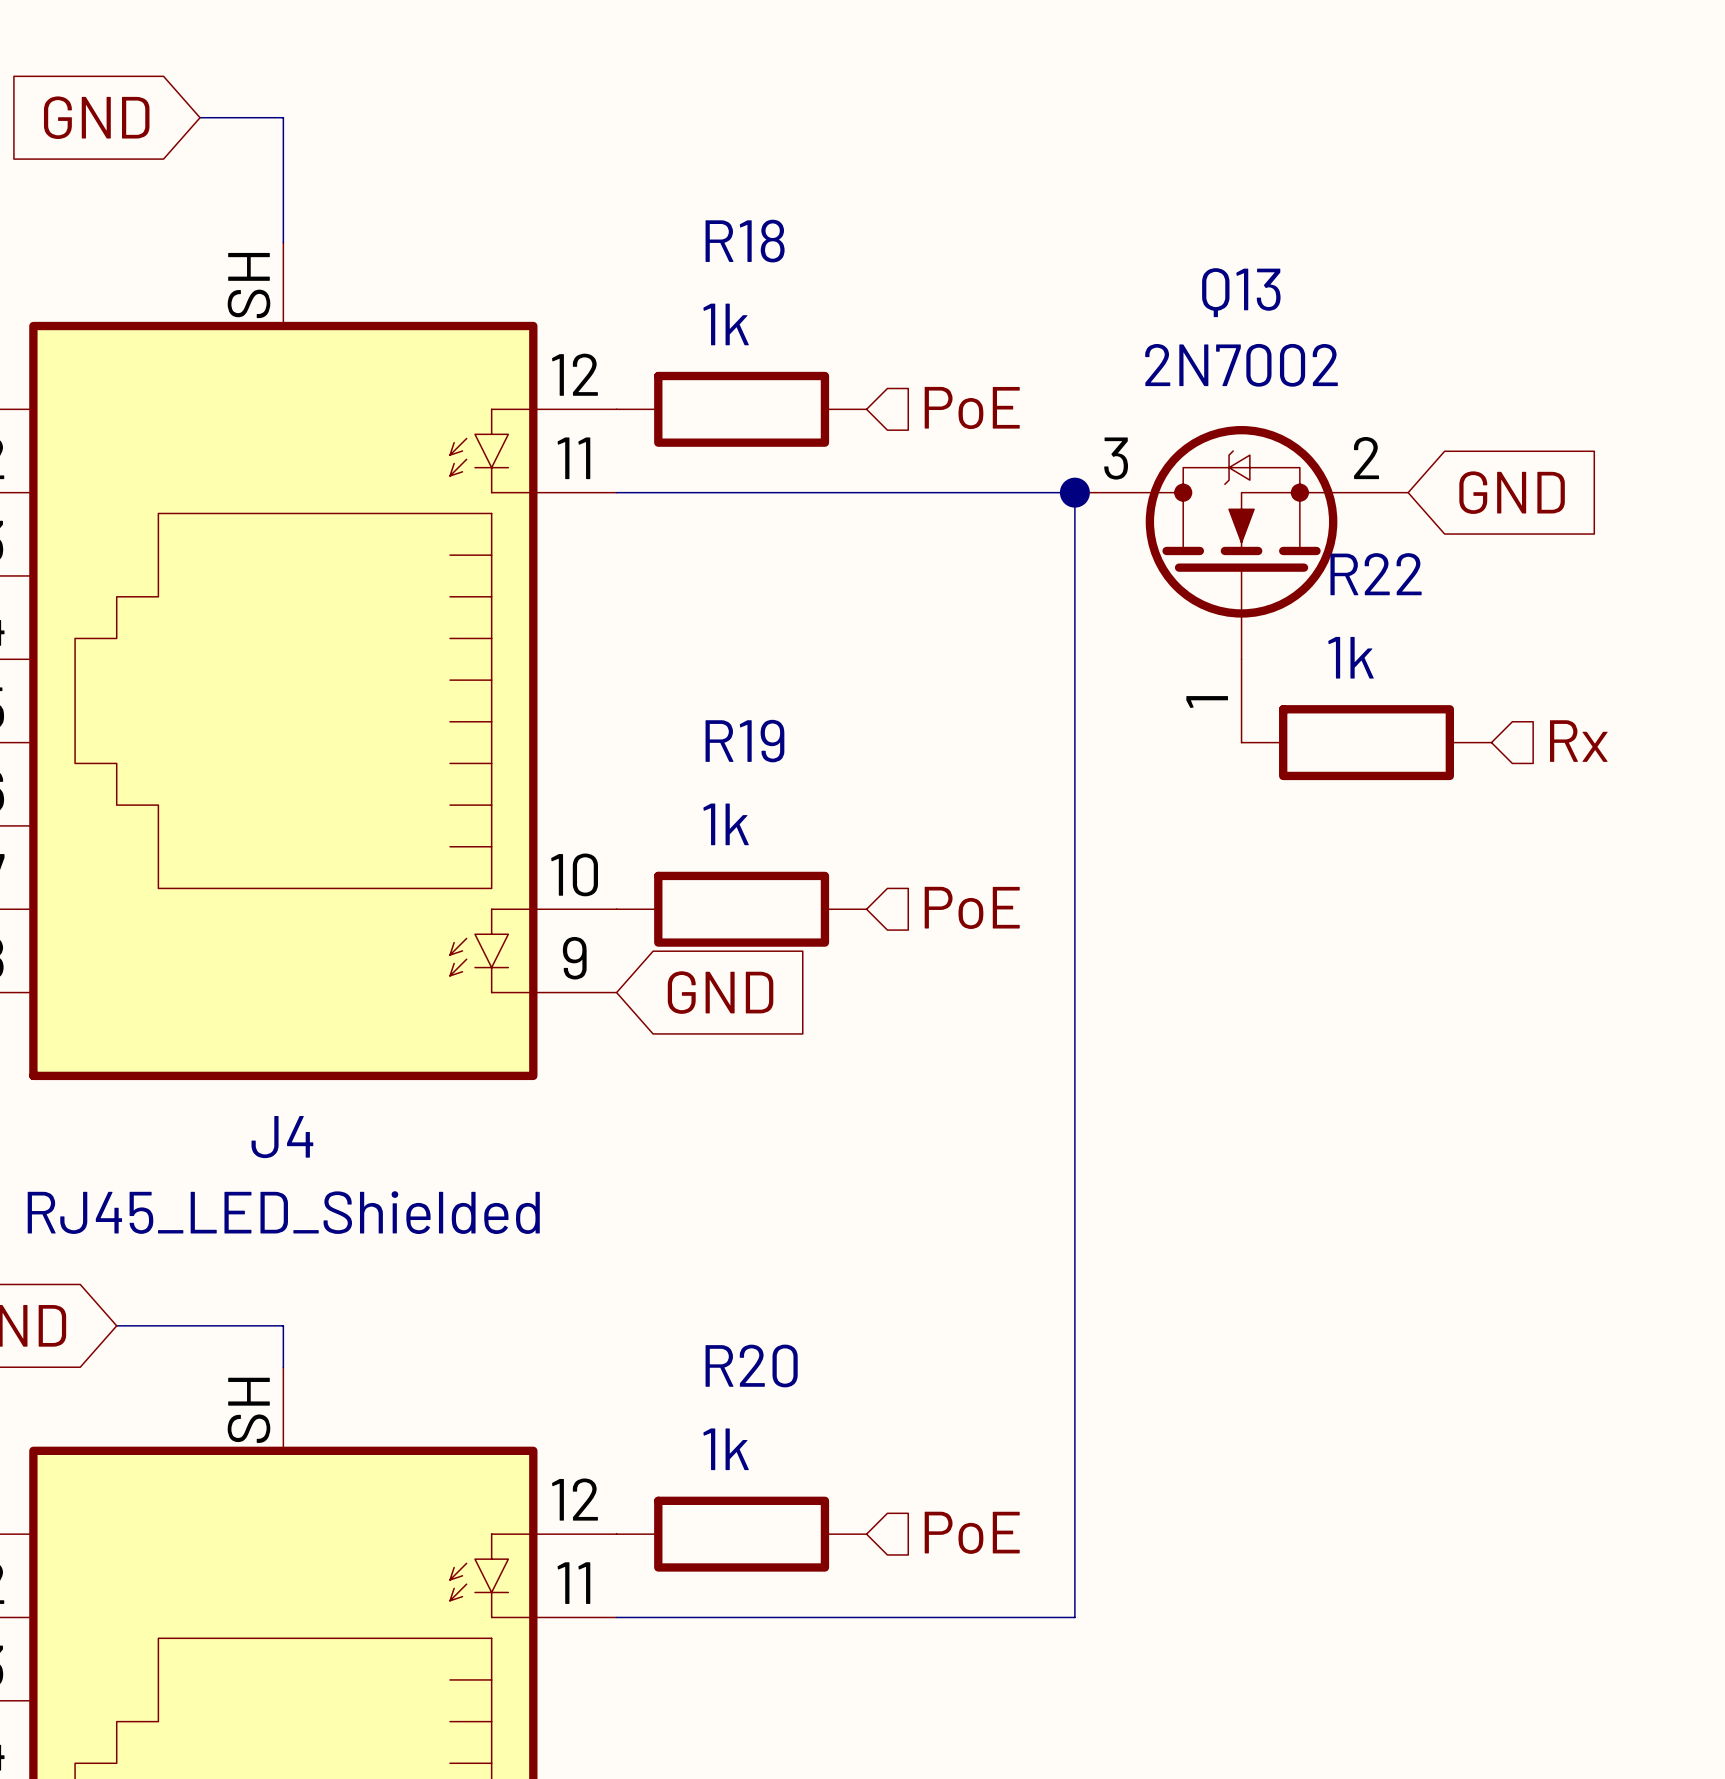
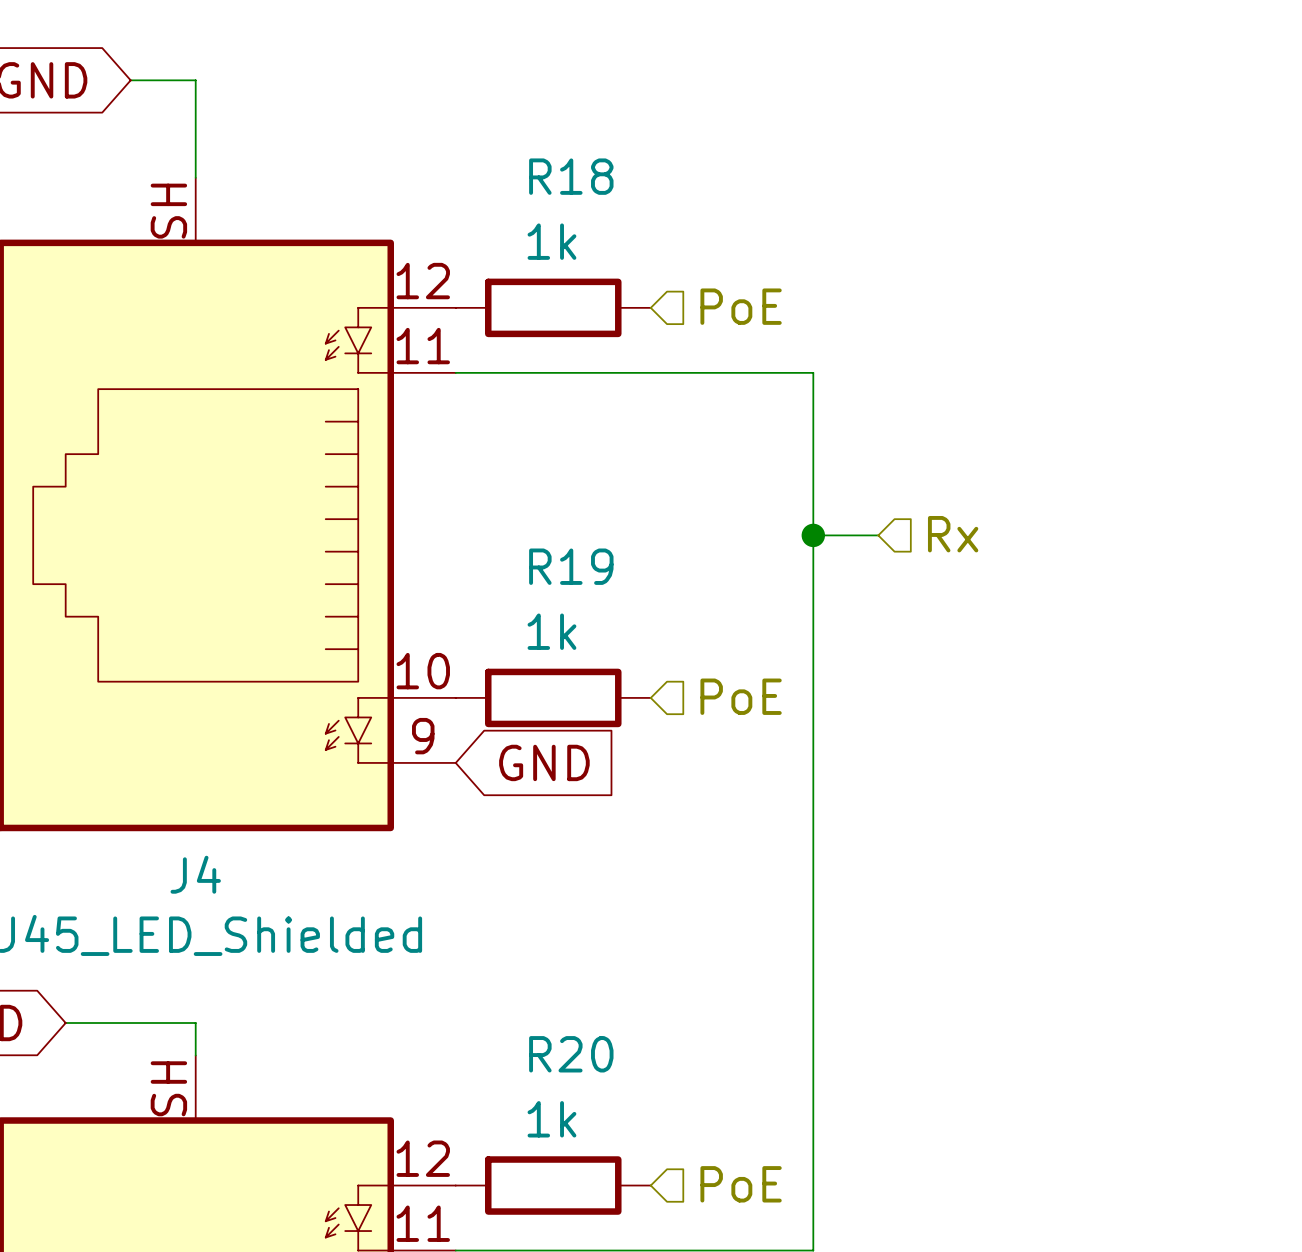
junction: (1074, 492) -> none
global label: GND (1512, 492) -> none
Q13: 2N7002 (1241, 584) -> none
wire: none -> (813, 535) (878, 535)
junction: none -> (813, 535)
hierarchical label position: Rx (1578, 741) -> Rx (953, 534)
R22: 1k (1366, 742) -> none

